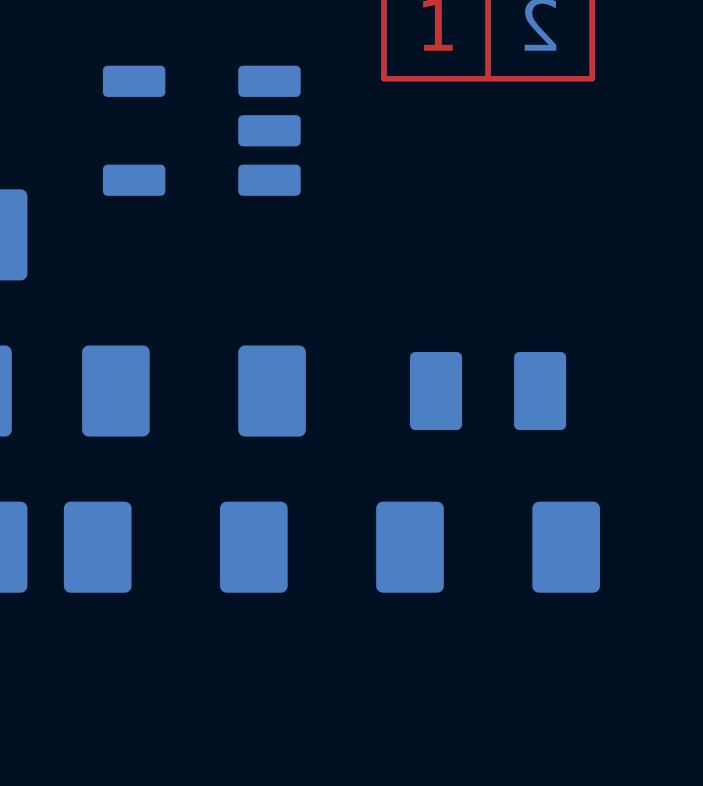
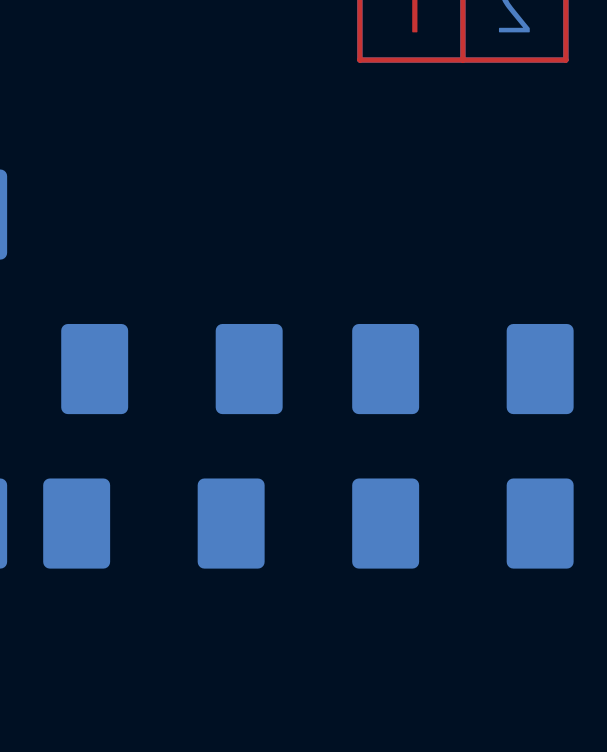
part: (201, 130) -> none
part footprint: [409, 351, 567, 431] -> [352, 323, 574, 415]

